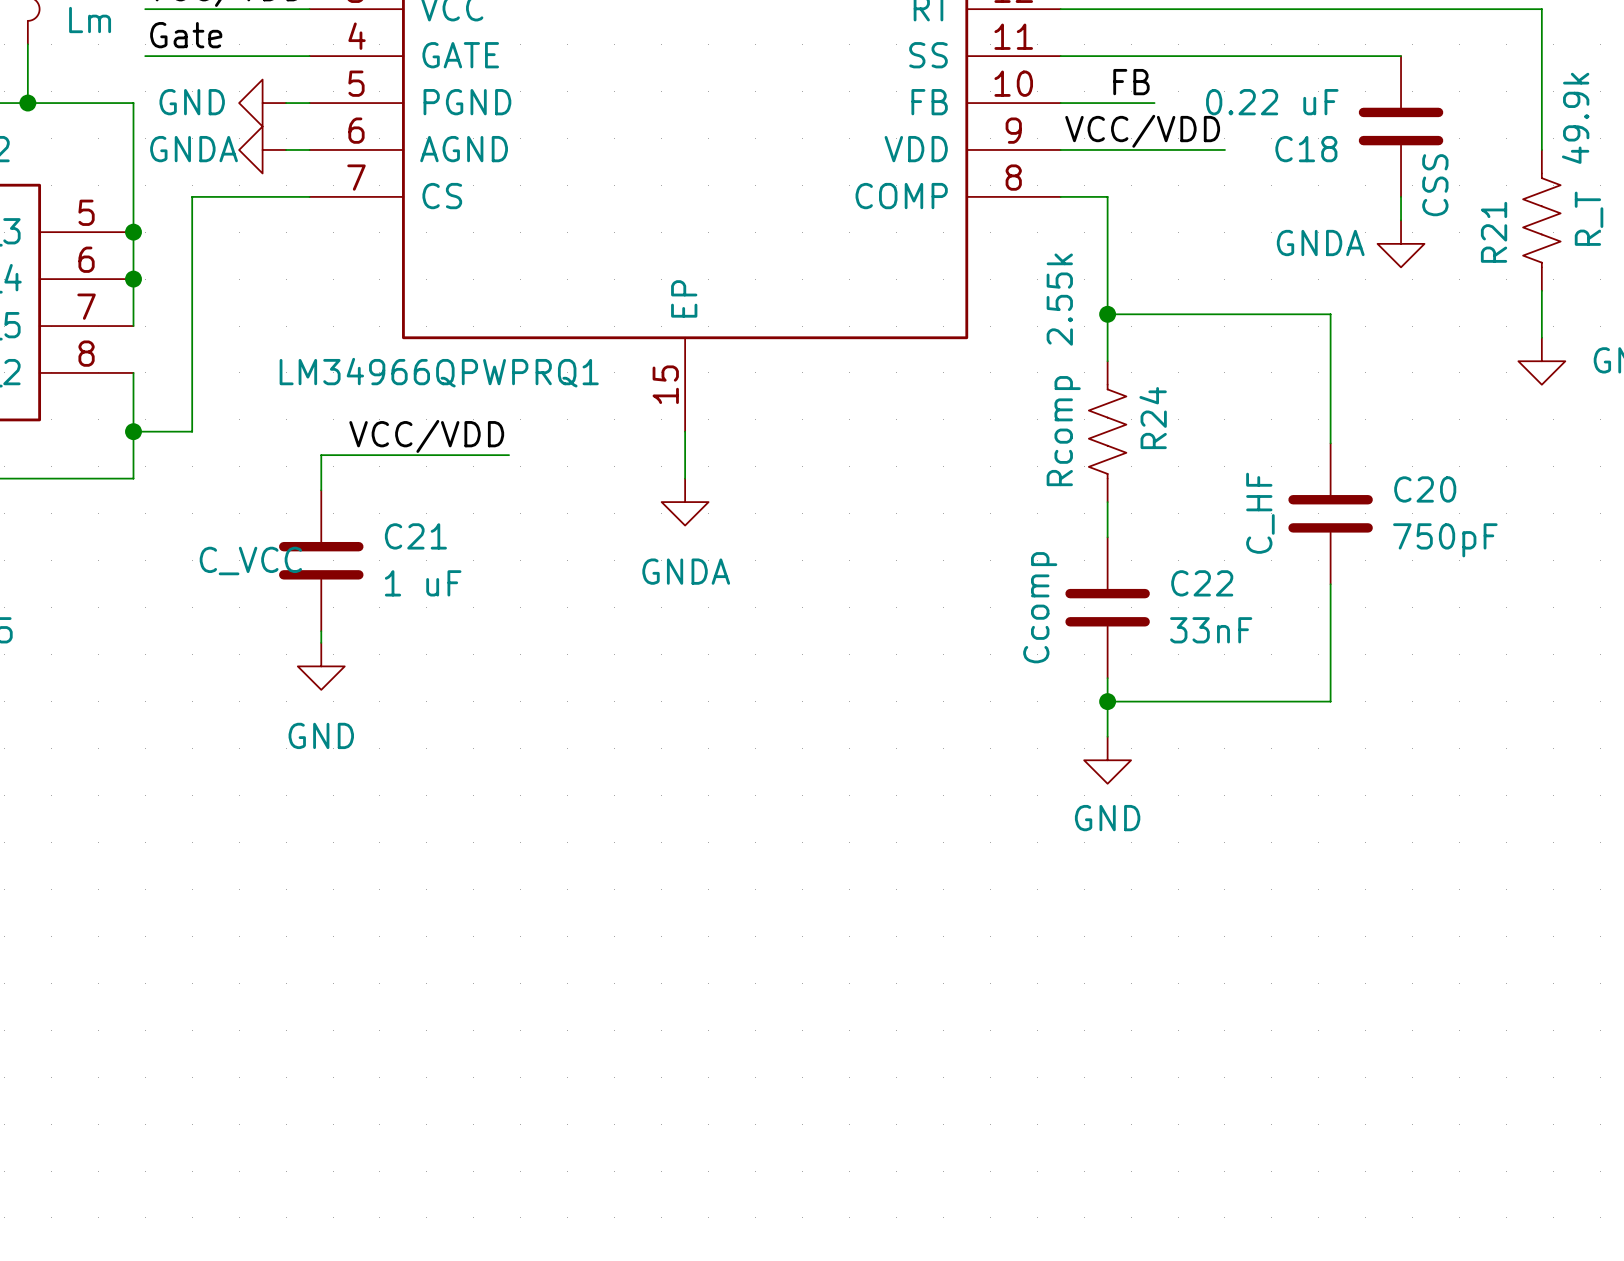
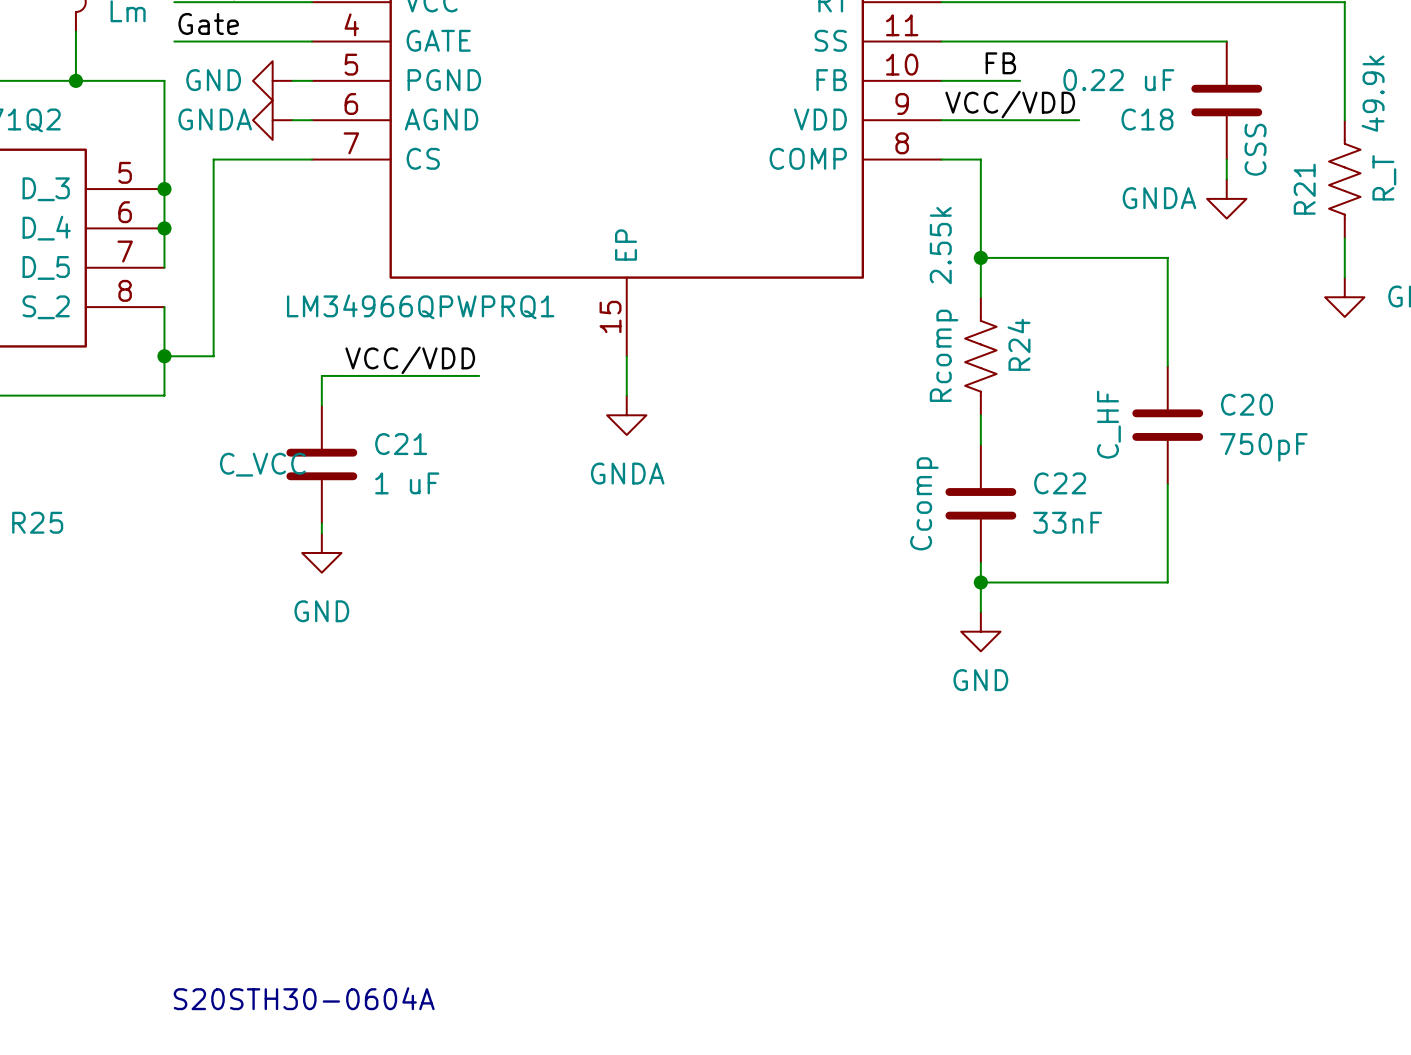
text: none -> S20STH30-0604A (304, 998)

